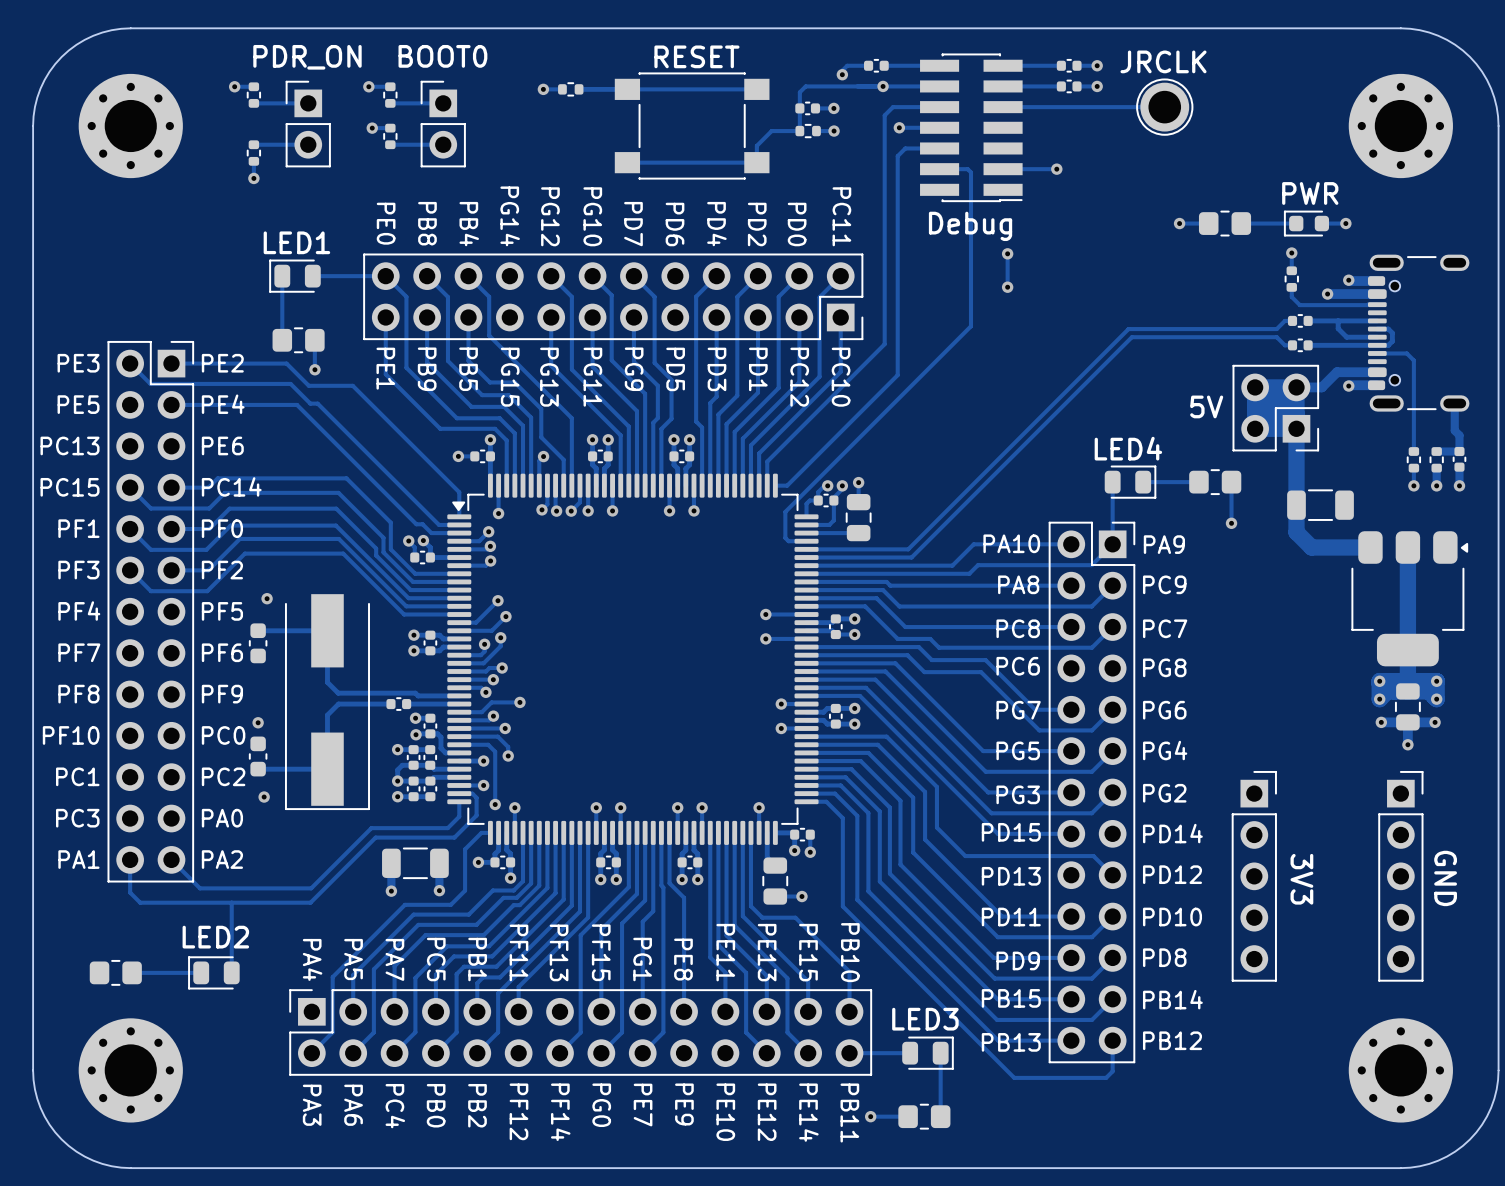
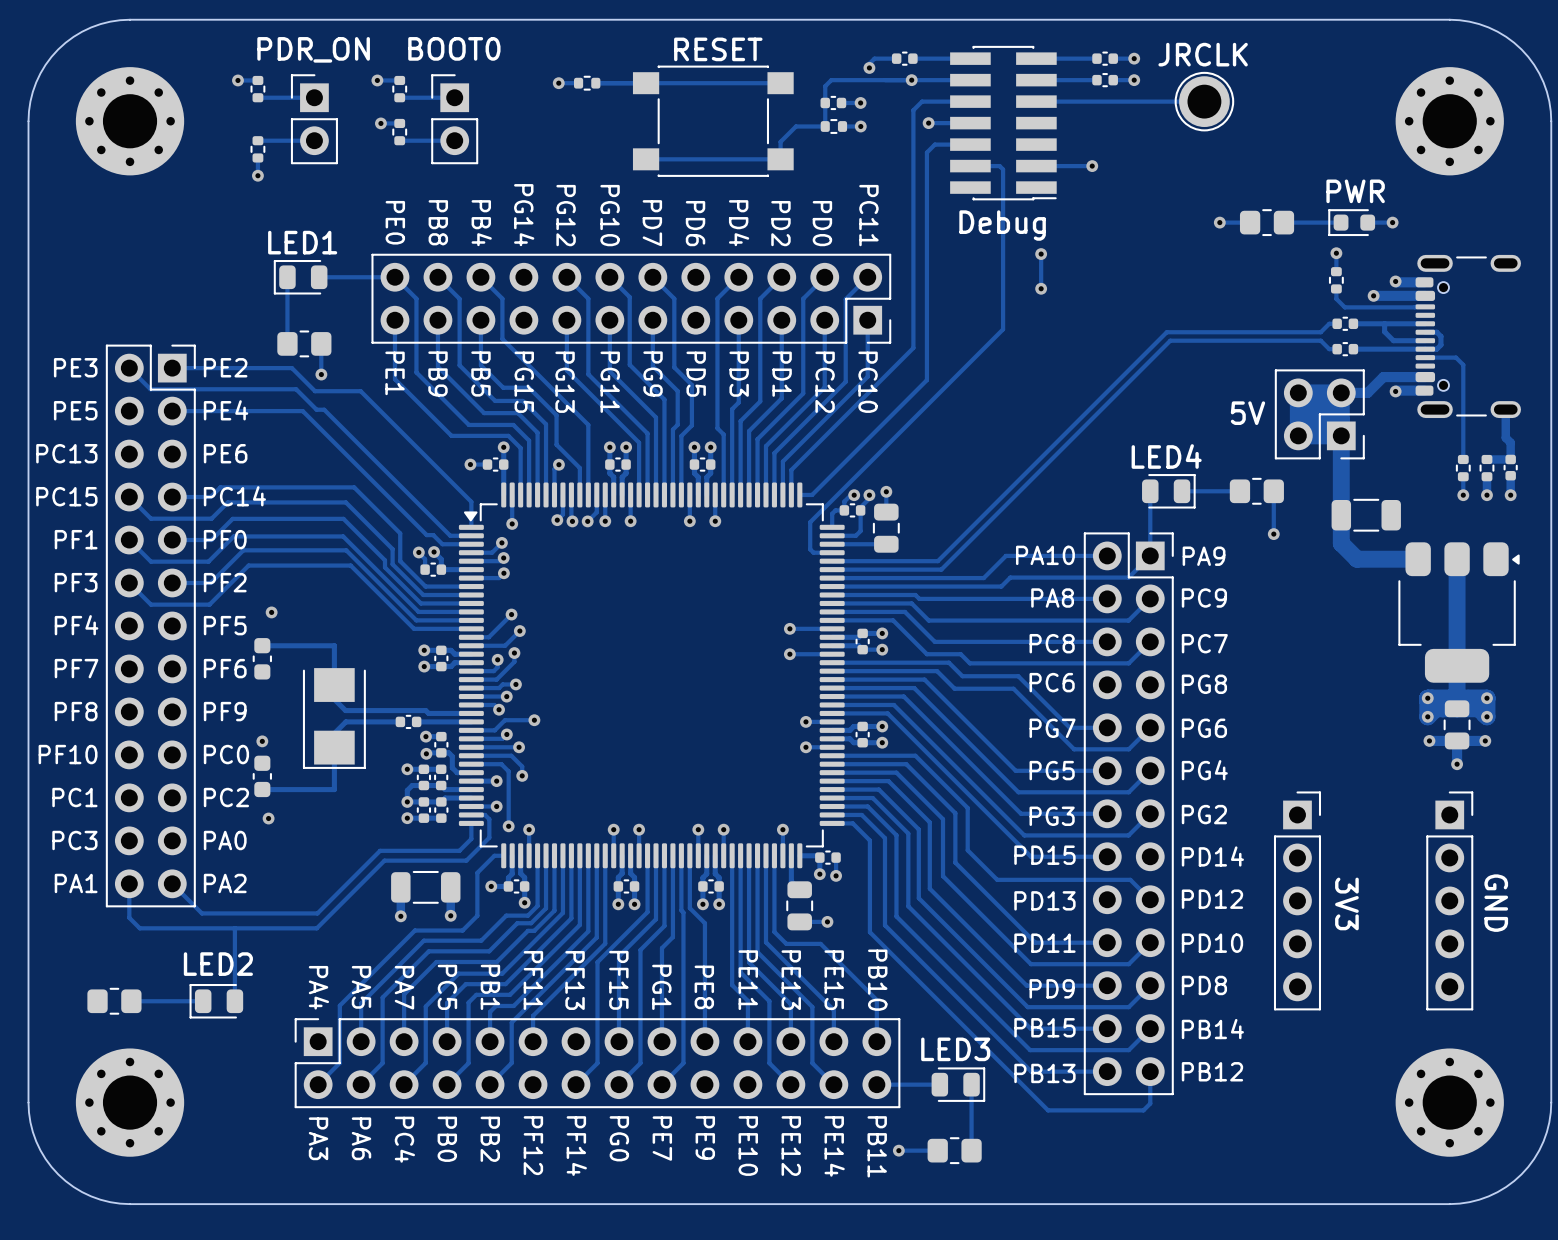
part footprint: [284, 594, 370, 811] -> [302, 668, 366, 769]

